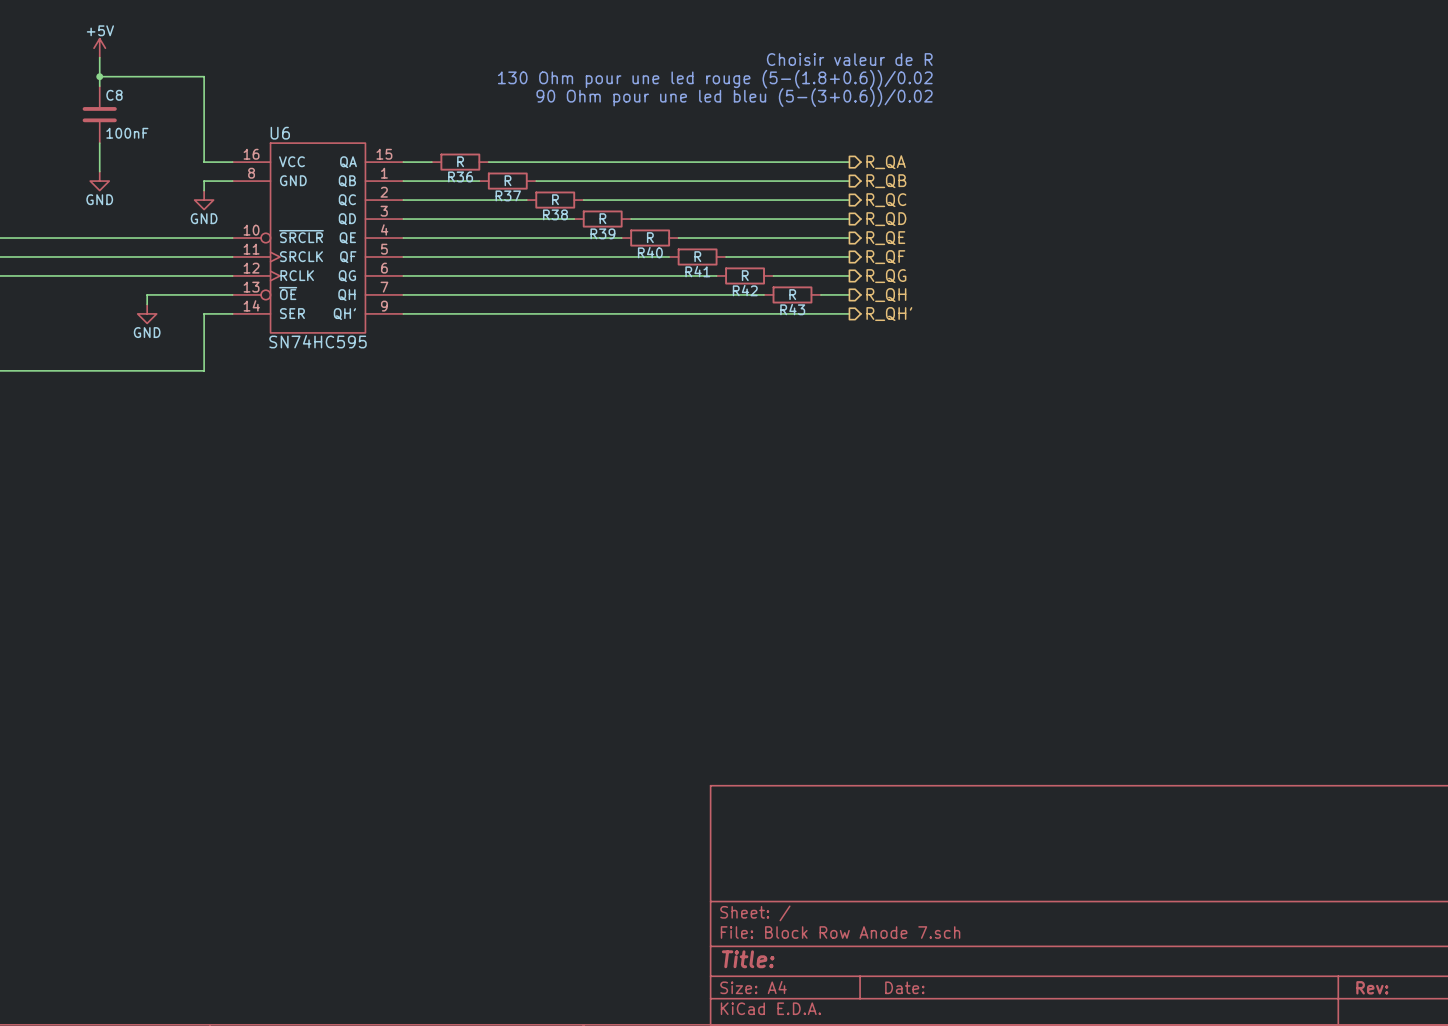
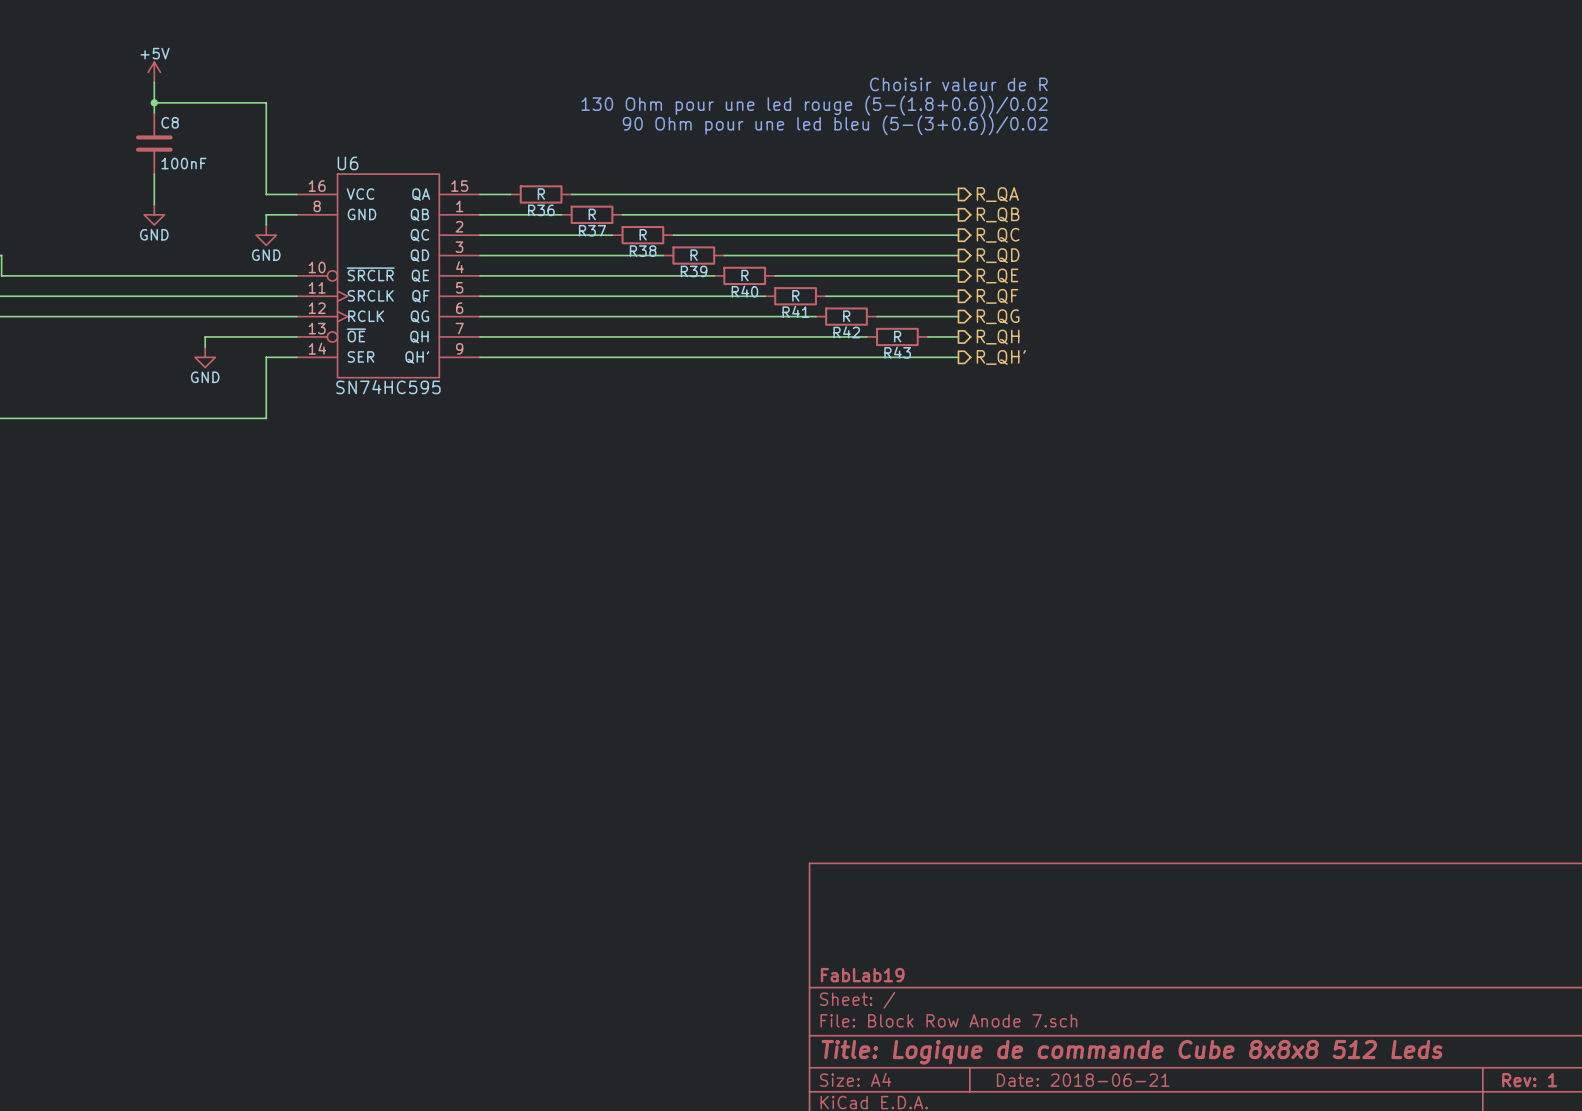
title block: none -> FabLab19 (862, 975)
title block: Title: (748, 959) -> Title: Logique de commande Cube 8x8x8 512 Leds (1131, 1052)
title block: Date: (904, 987) -> Date: 2018-06-21 (1083, 1080)
title block: Rev: (1372, 987) -> Rev: 1 (1529, 1080)

